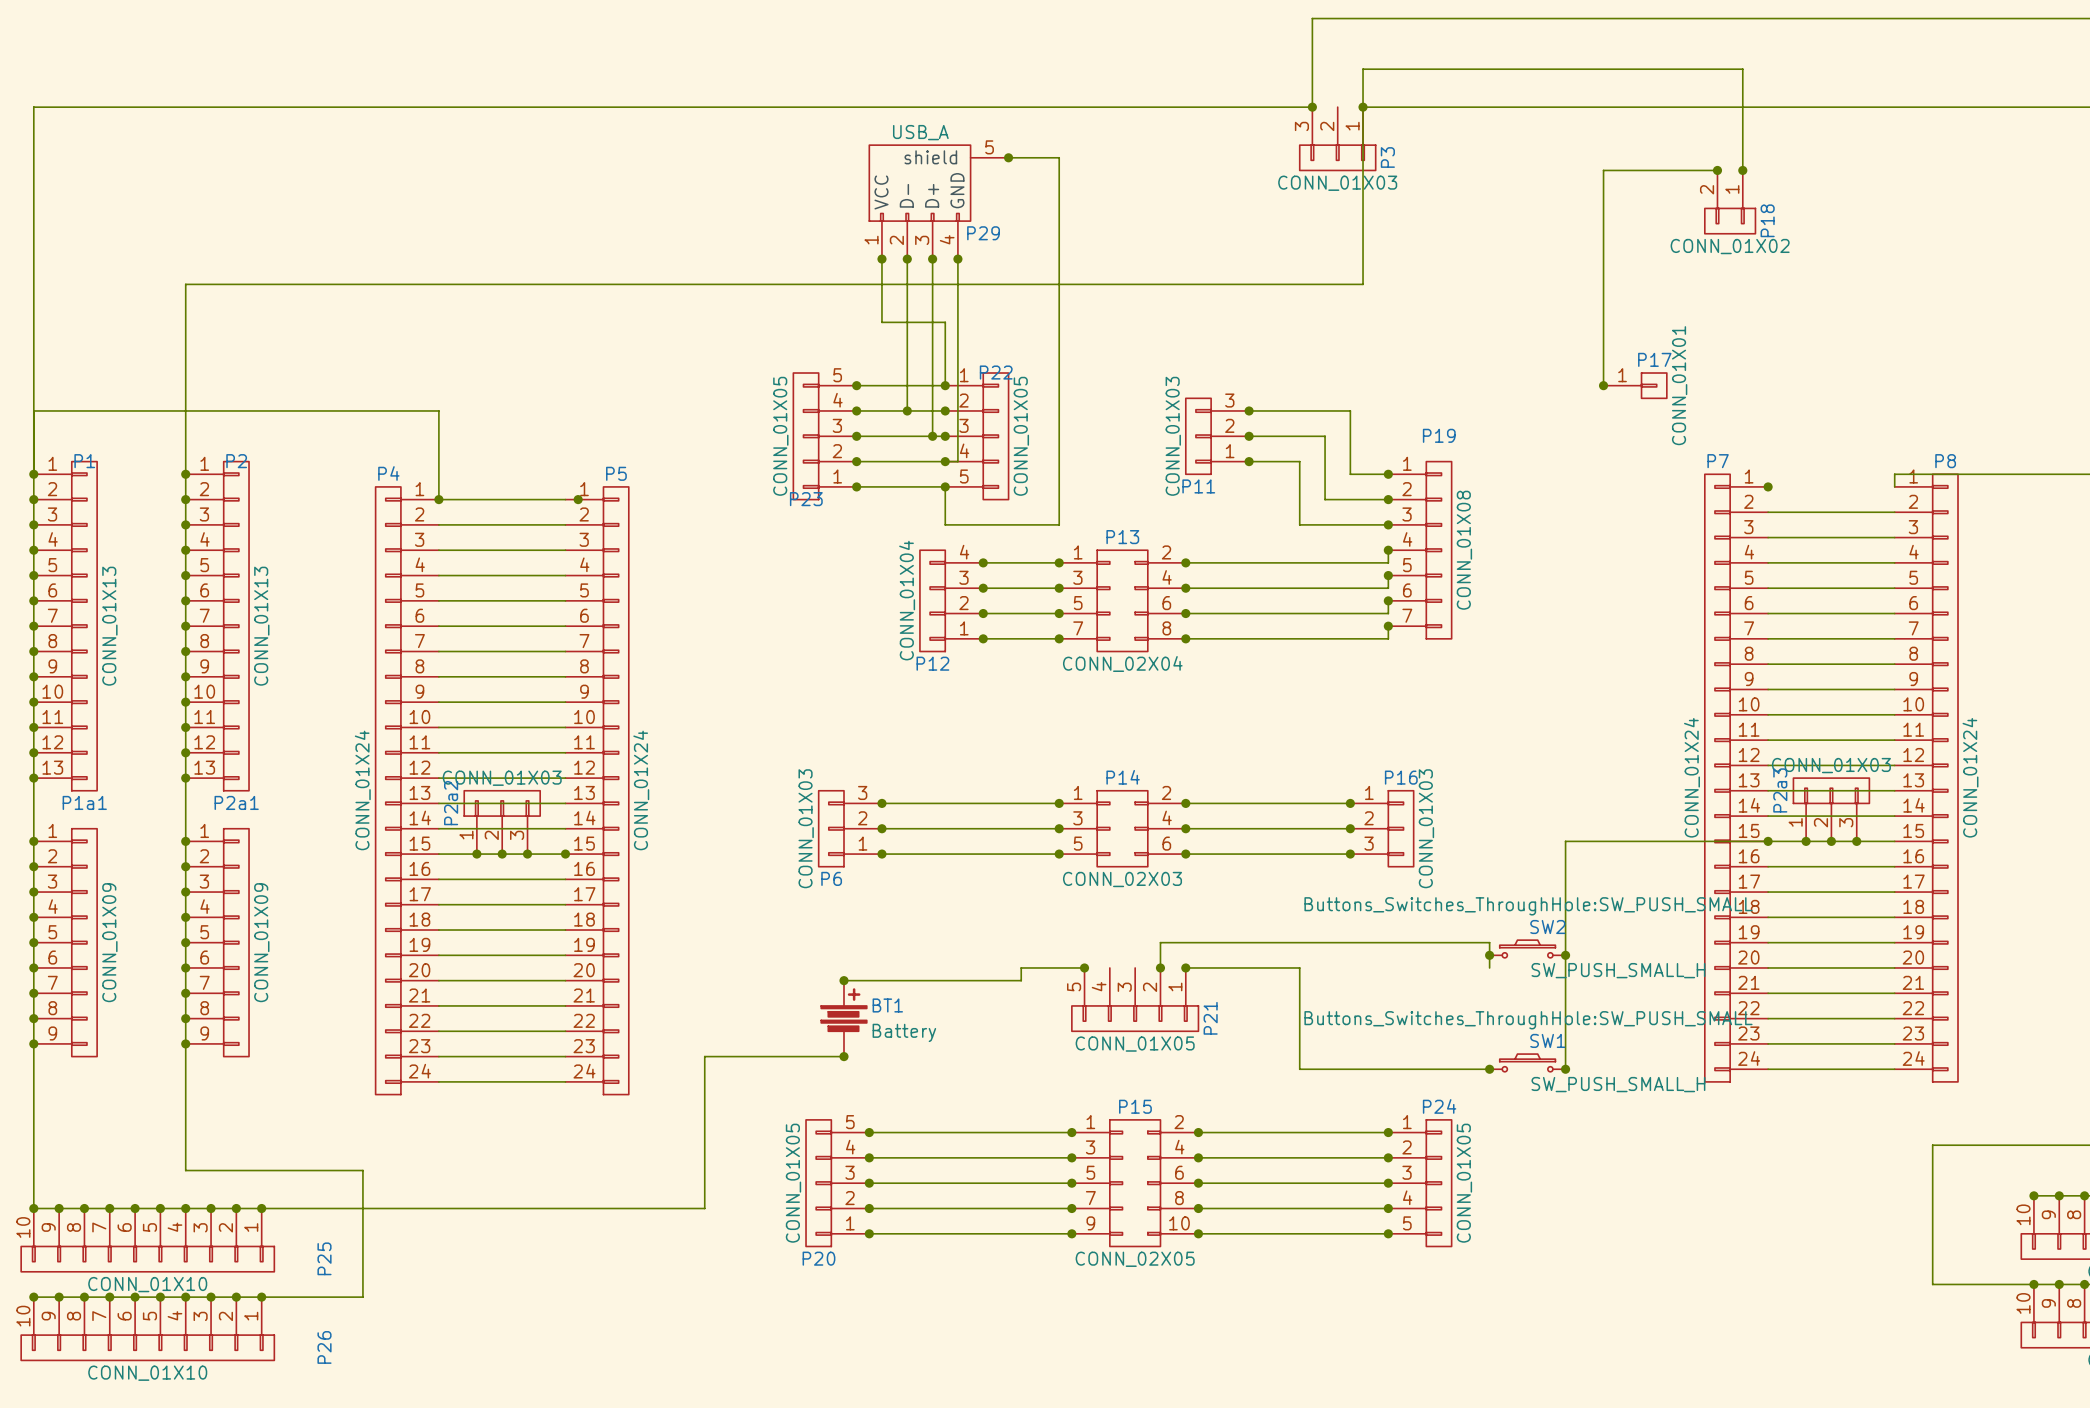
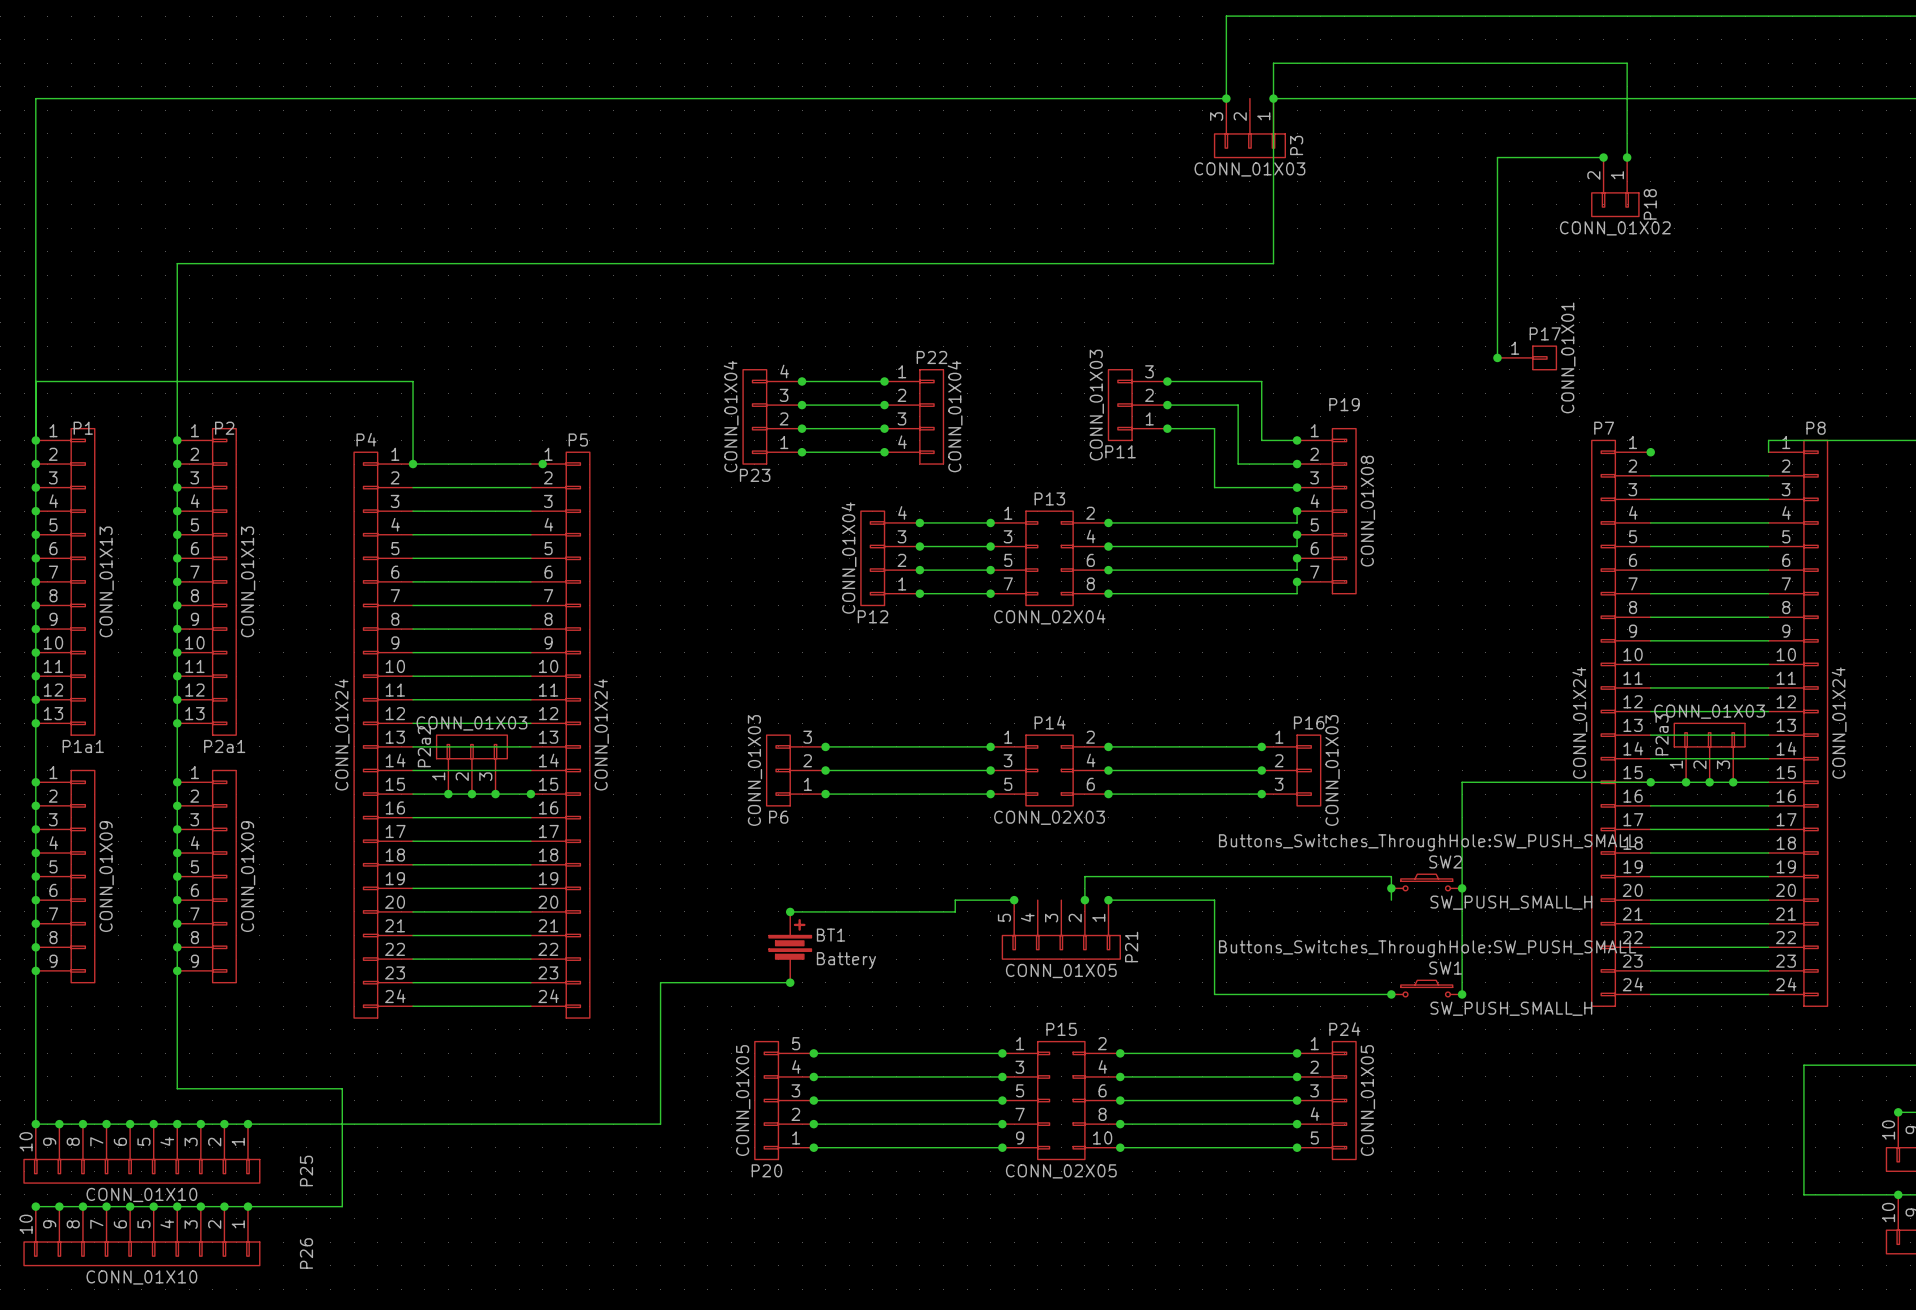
wire: (1008, 157) (1059, 157) (1059, 524) (945, 524) (945, 486) -> none
junction: (1008, 157) -> none
P29: USB_A (938, 202) -> none
wire: (881, 259) (881, 322) (945, 322) (945, 385) (856, 385) -> none
junction: (881, 259) -> none
wire: (907, 259) (907, 410) -> none
junction: (907, 259) -> none
wire: (932, 259) (932, 436) -> none
junction: (932, 259) -> none
wire: (957, 259) (957, 461) (945, 461) -> none
junction: (957, 259) -> none
P23 symbol: [793, 373, 857, 500] -> [743, 369, 803, 465]
P22 symbol: [945, 373, 1009, 500] -> [884, 369, 944, 465]
junction: (856, 385) -> none
junction: (945, 385) -> none
junction: (907, 410) -> none
P23 value: CONN_01X05 (780, 436) -> CONN_01X04 (731, 416)
junction: (932, 436) -> none
P22 value: CONN_01X05 (1021, 436) -> CONN_01X04 (955, 416)

